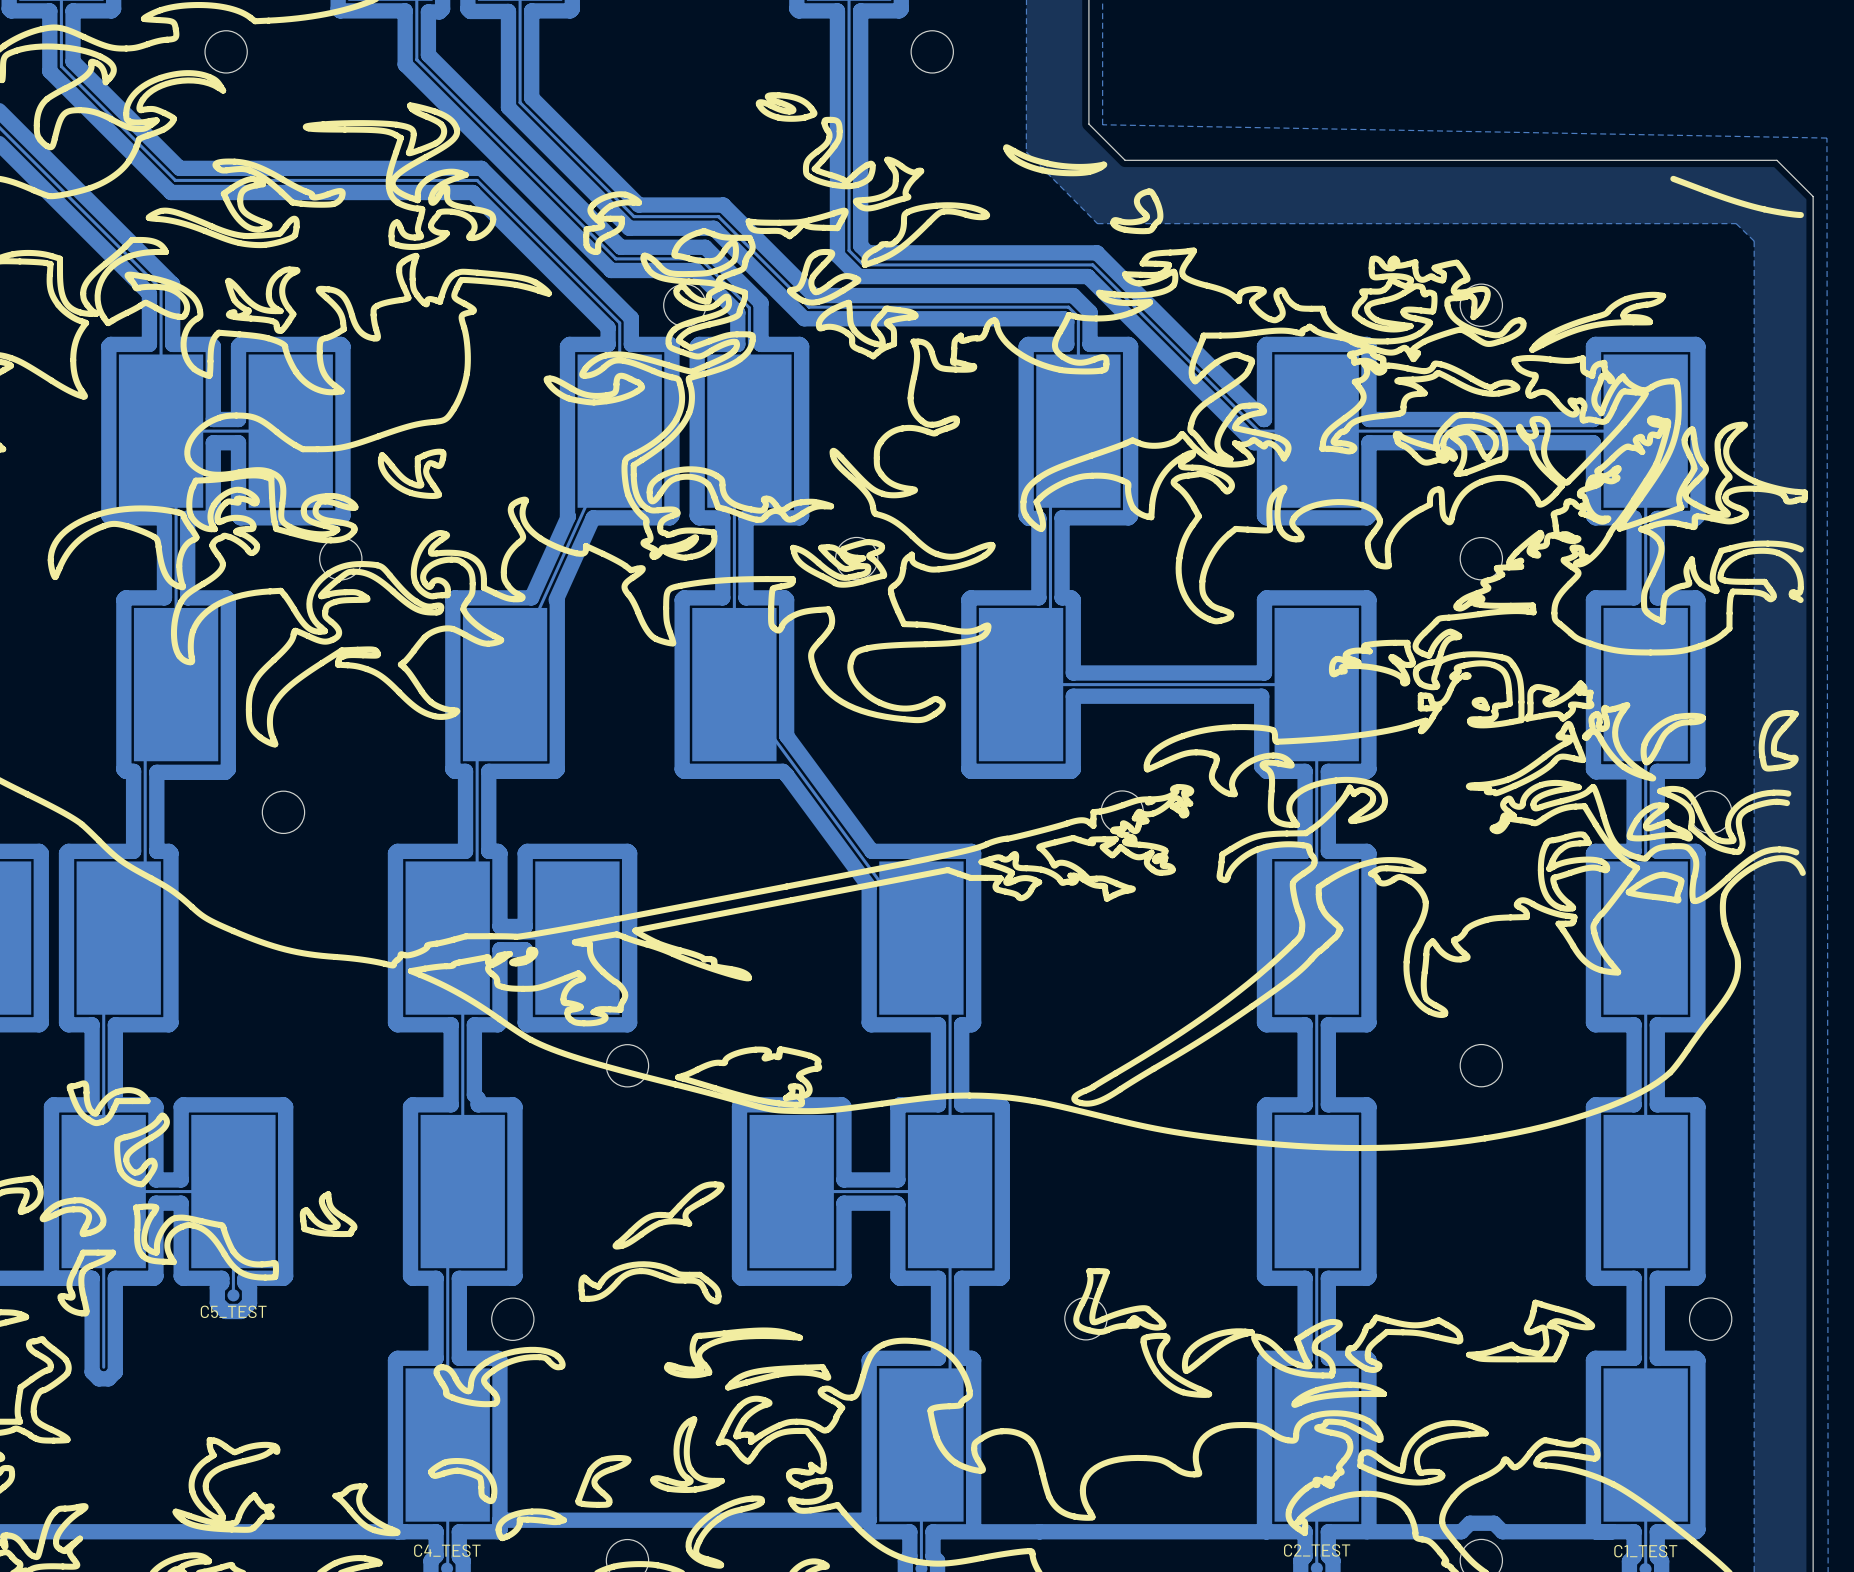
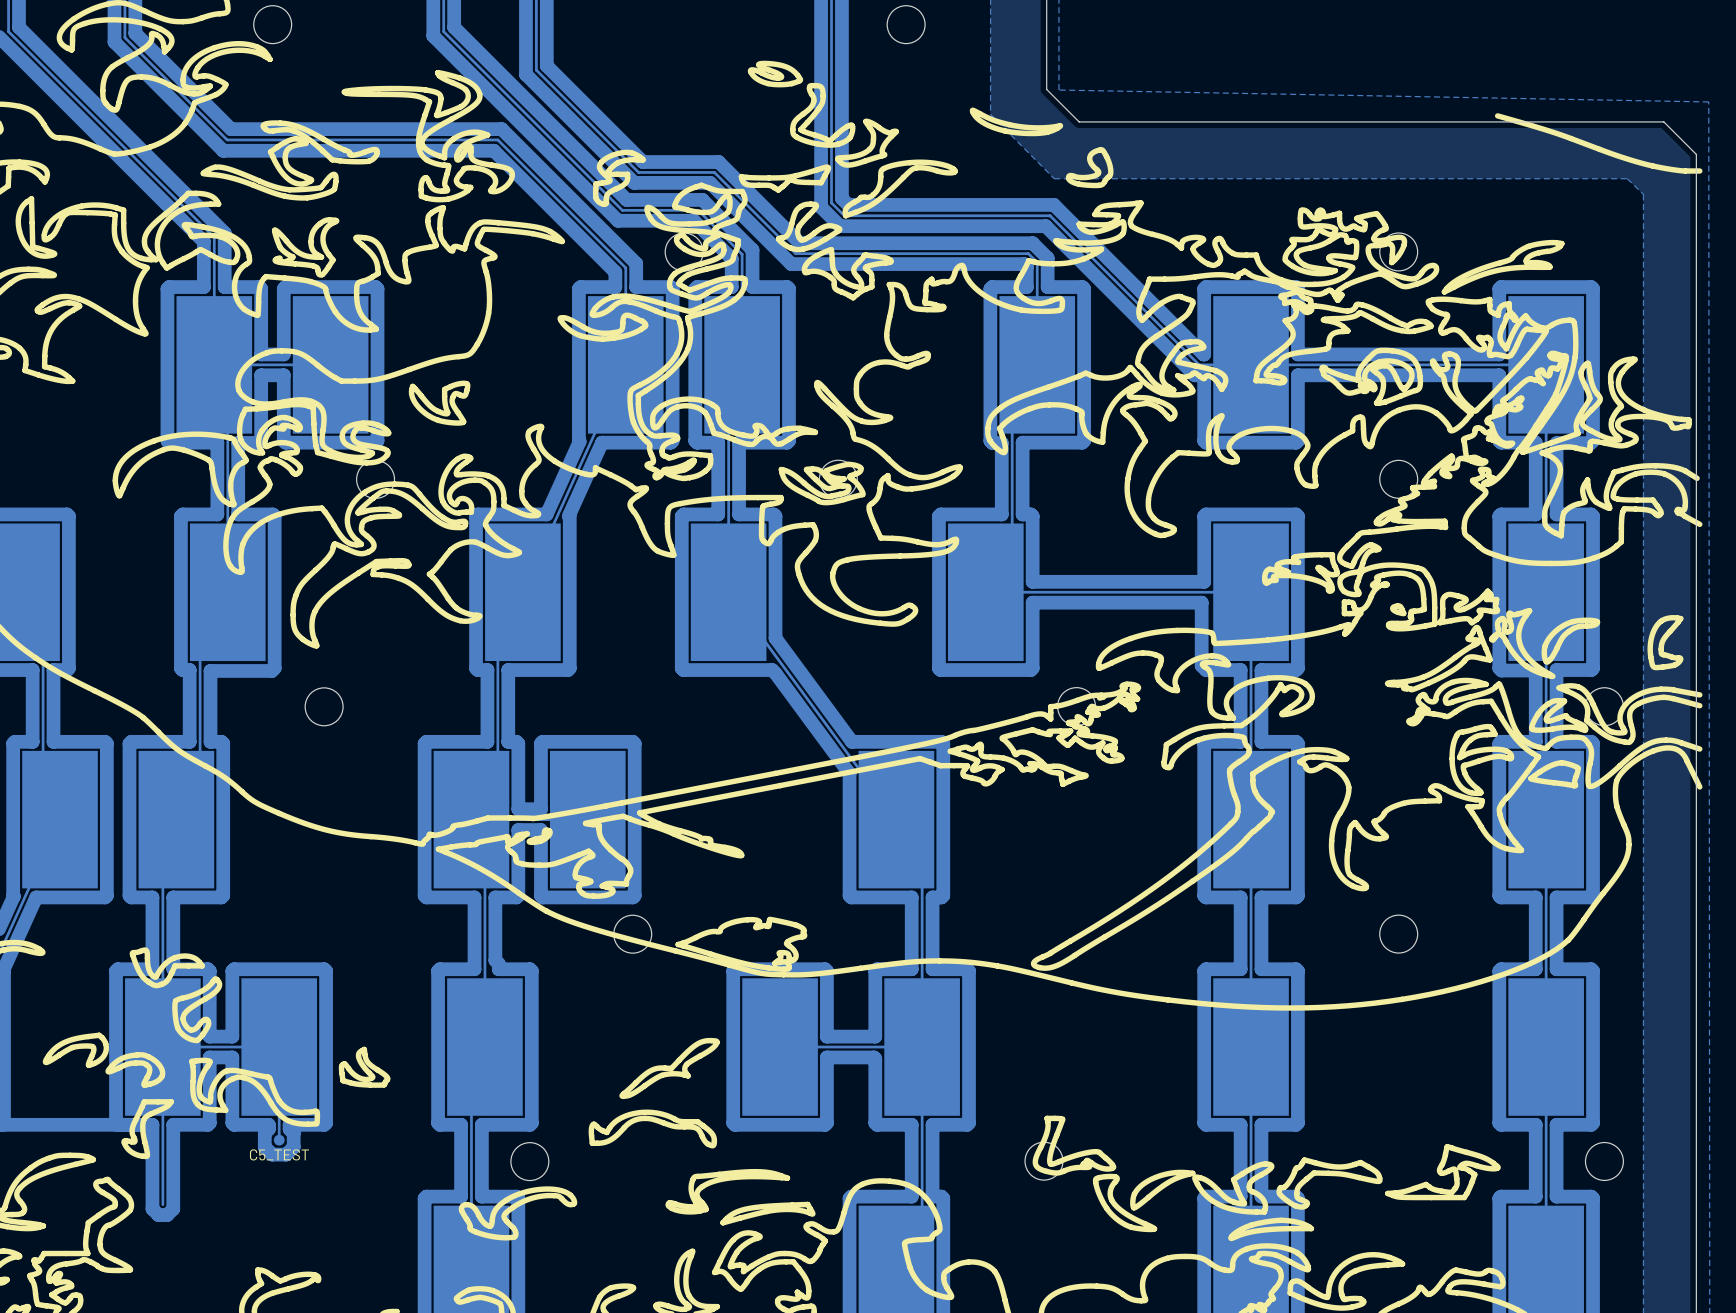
line: none -> (1497, 115) (1570, 138)
line: none -> (1699, 170) (1685, 170)
line: none -> (1685, 471) (1697, 478)
line: none -> (1685, 516) (1699, 524)
line: none -> (1674, 690) (1699, 694)
line: none -> (1672, 698) (1699, 705)
line: none -> (1681, 742) (1699, 749)
line: none -> (1687, 761) (1699, 786)

